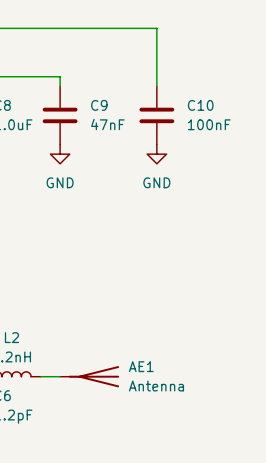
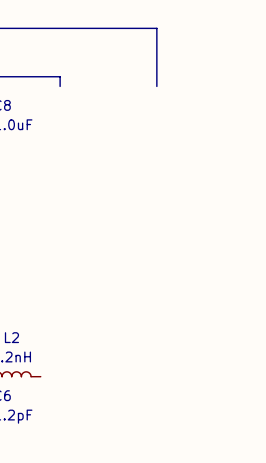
C9: 47nF (60, 115) -> none
C10: 100nF (156, 115) -> none
power symbol: GND (60, 154) -> none
power symbol: GND (156, 154) -> none
wire: (40, 376) (60, 376) -> none
AE1: Antenna (89, 376) -> none

